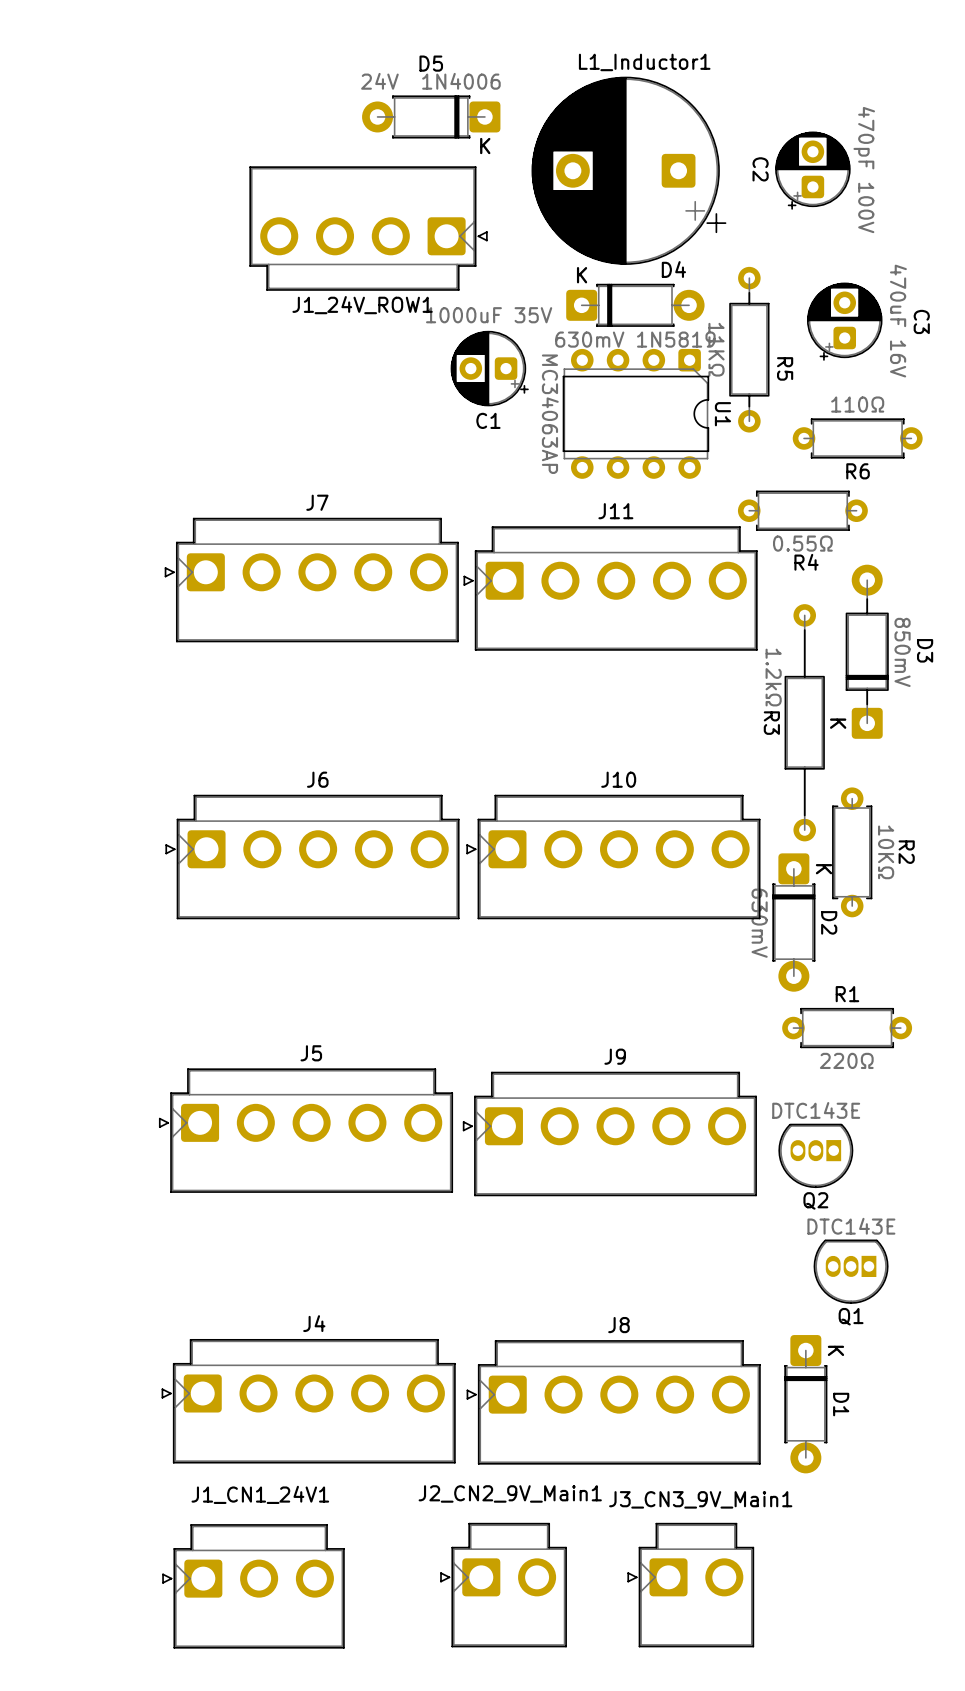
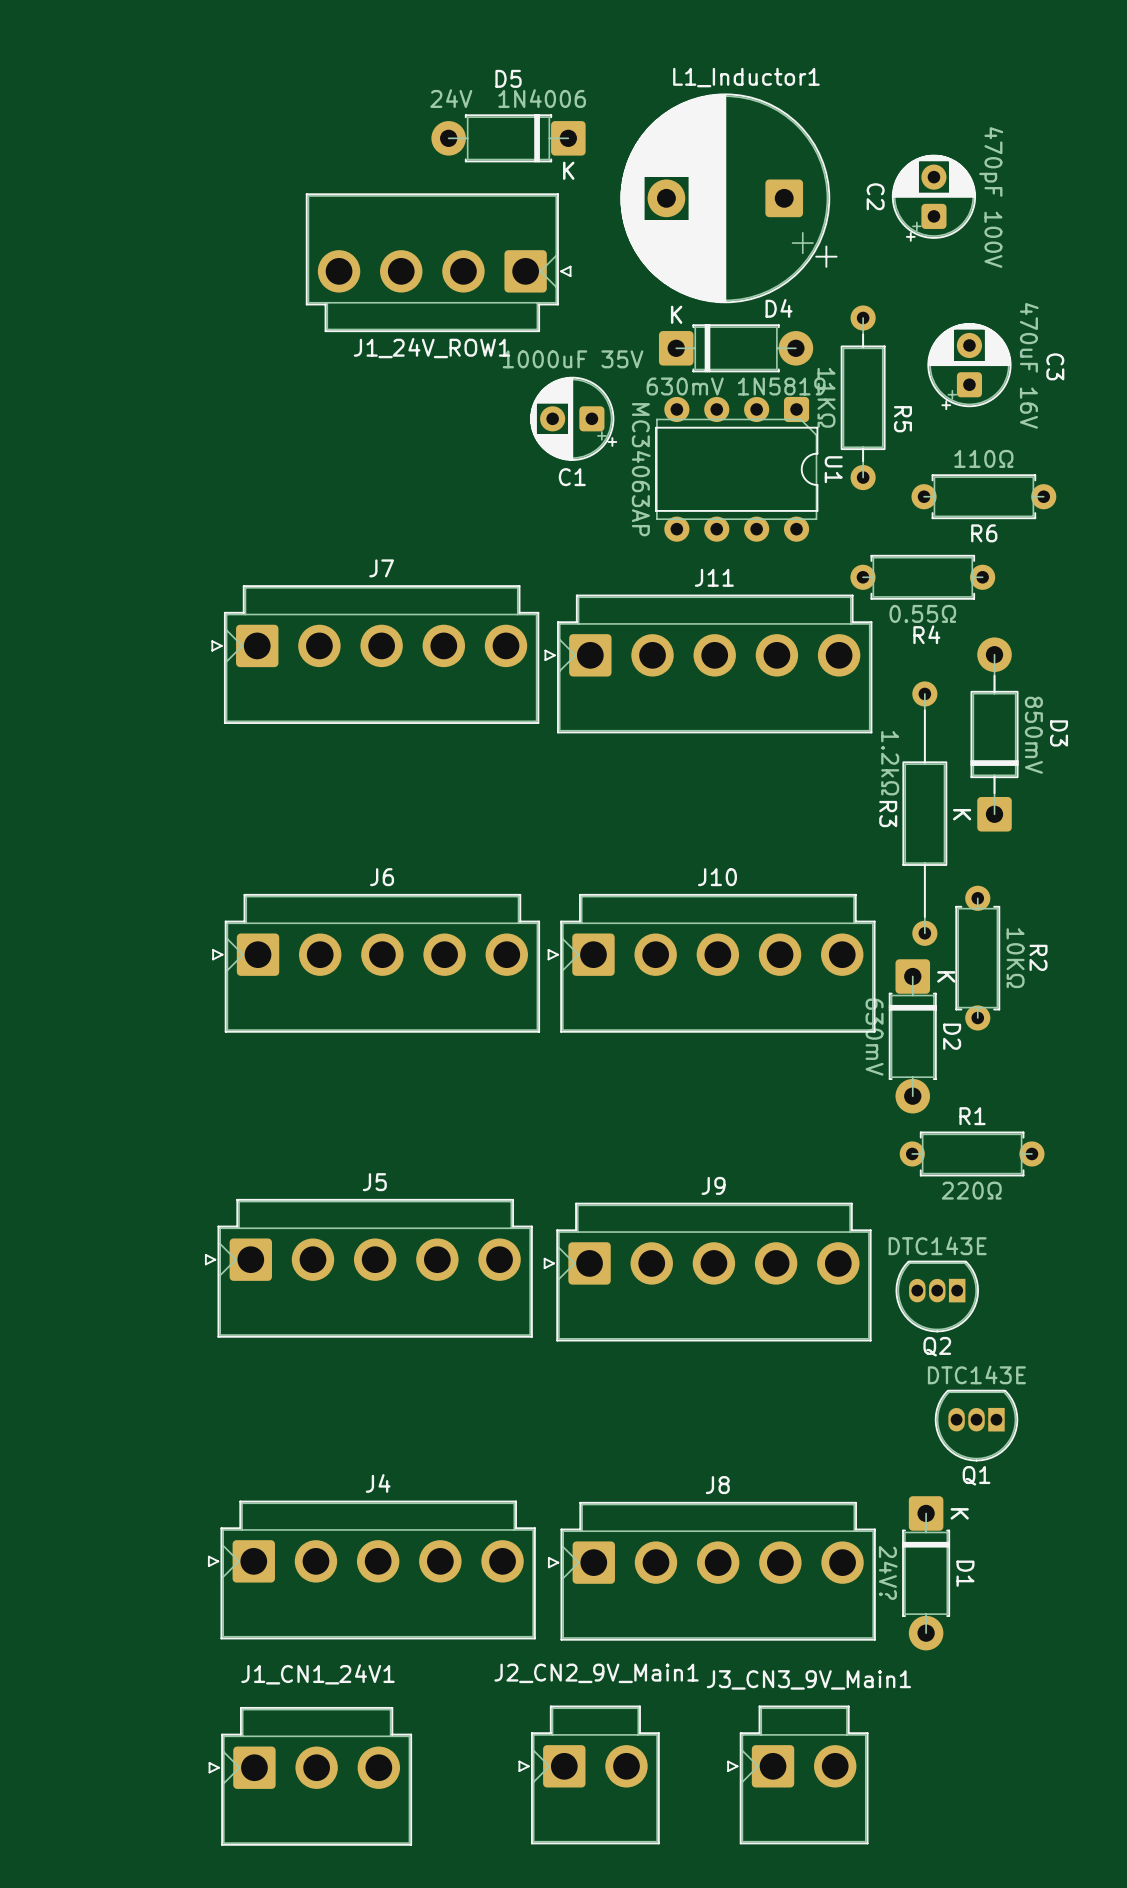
D1 value: none -> 24V? (888, 1572)

